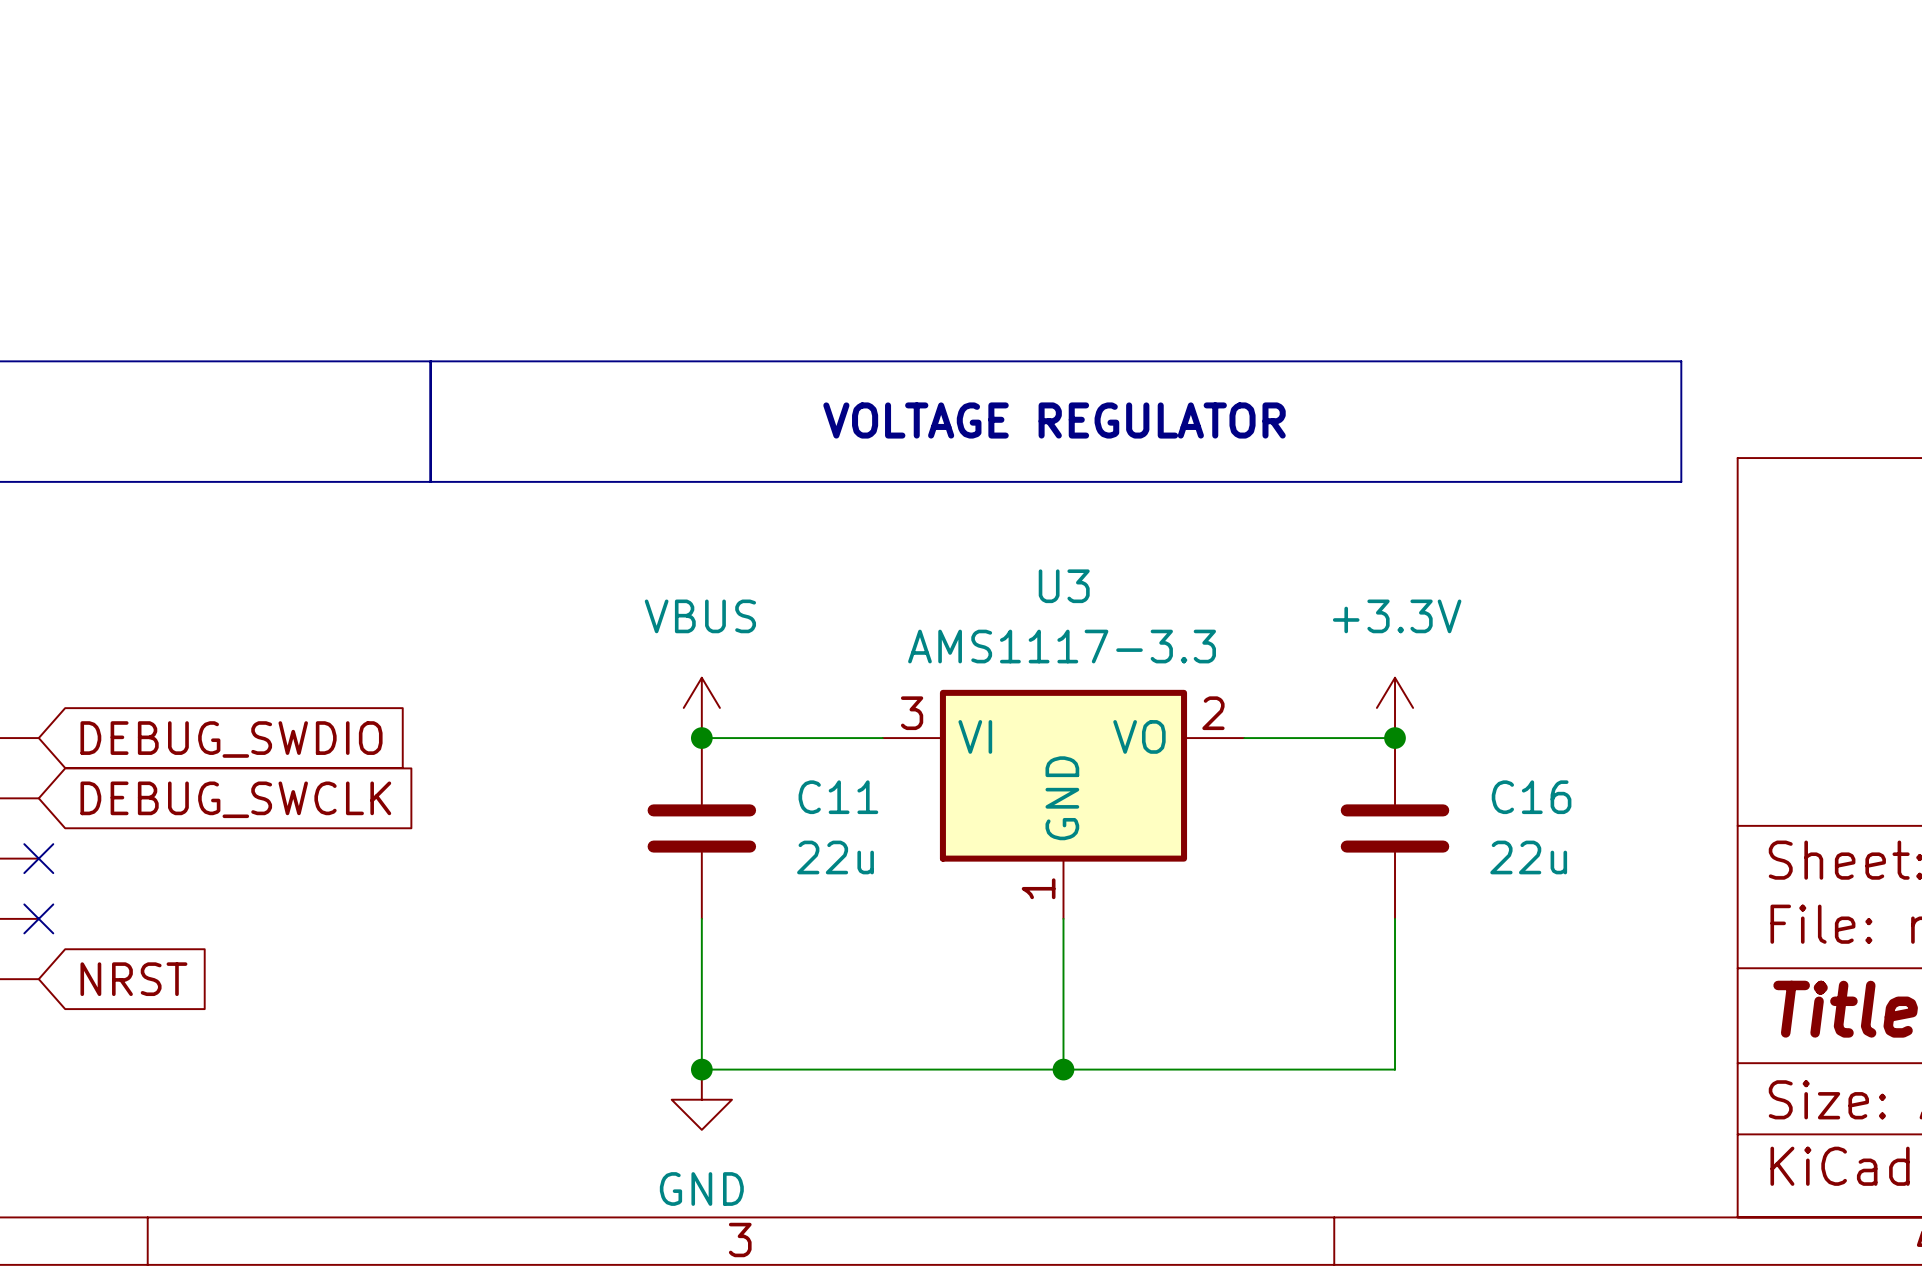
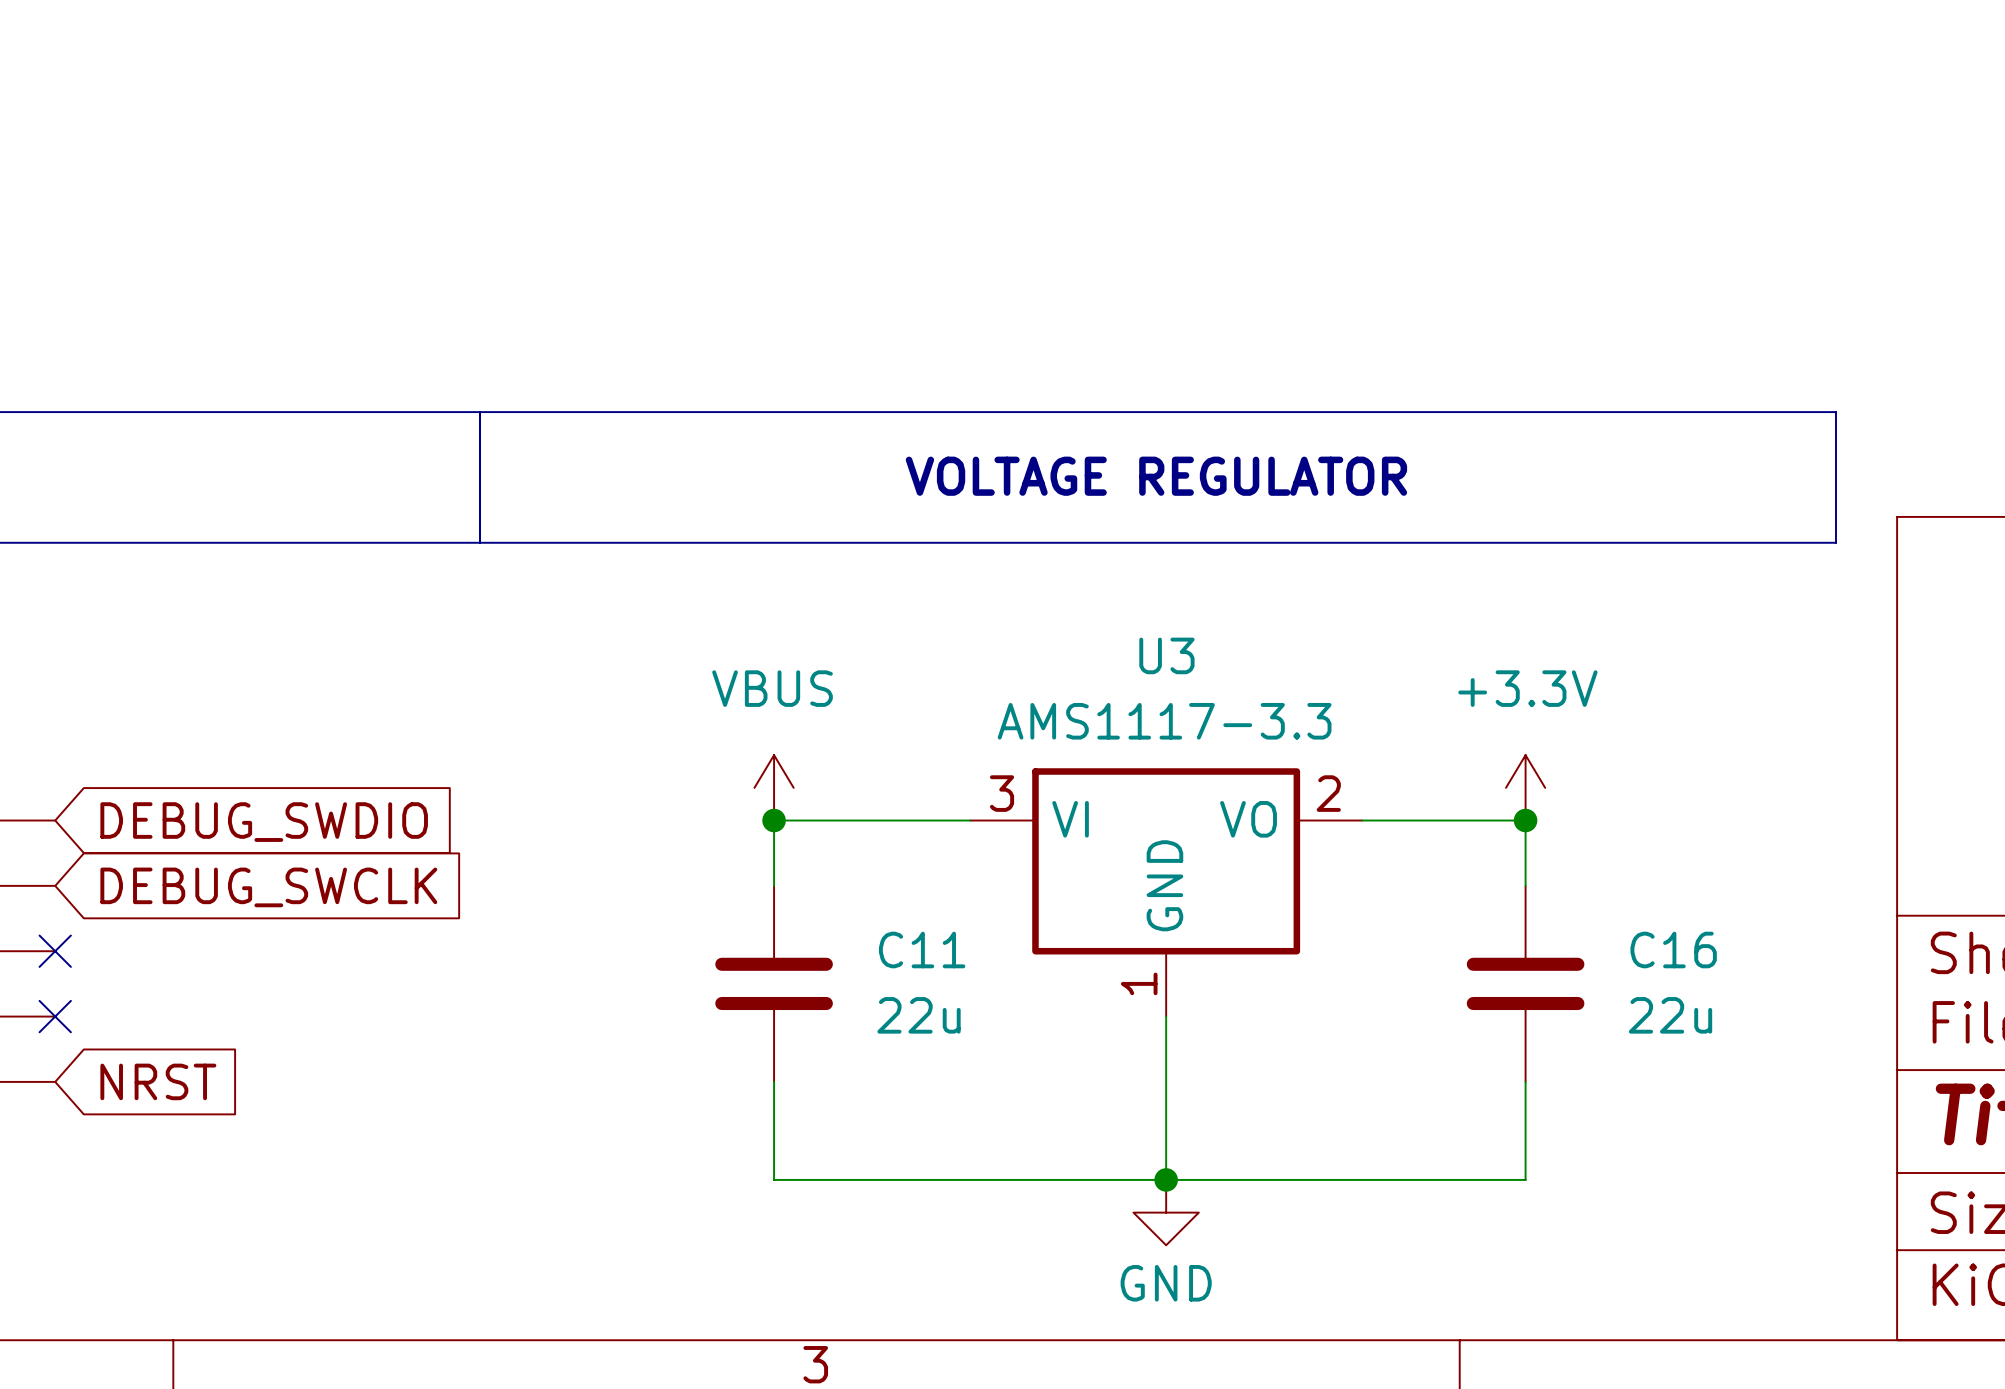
U3 symbol: [882, 689, 1245, 919] -> [970, 768, 1363, 1017]
C11 position: (701, 828) -> (774, 983)
C16 position: (1395, 828) -> (1525, 983)
junction: (701, 1069) -> none
power symbol position: GND (701, 1099) -> GND (1166, 1212)
power symbol text position: GND (701, 1189) -> GND (1166, 1283)

